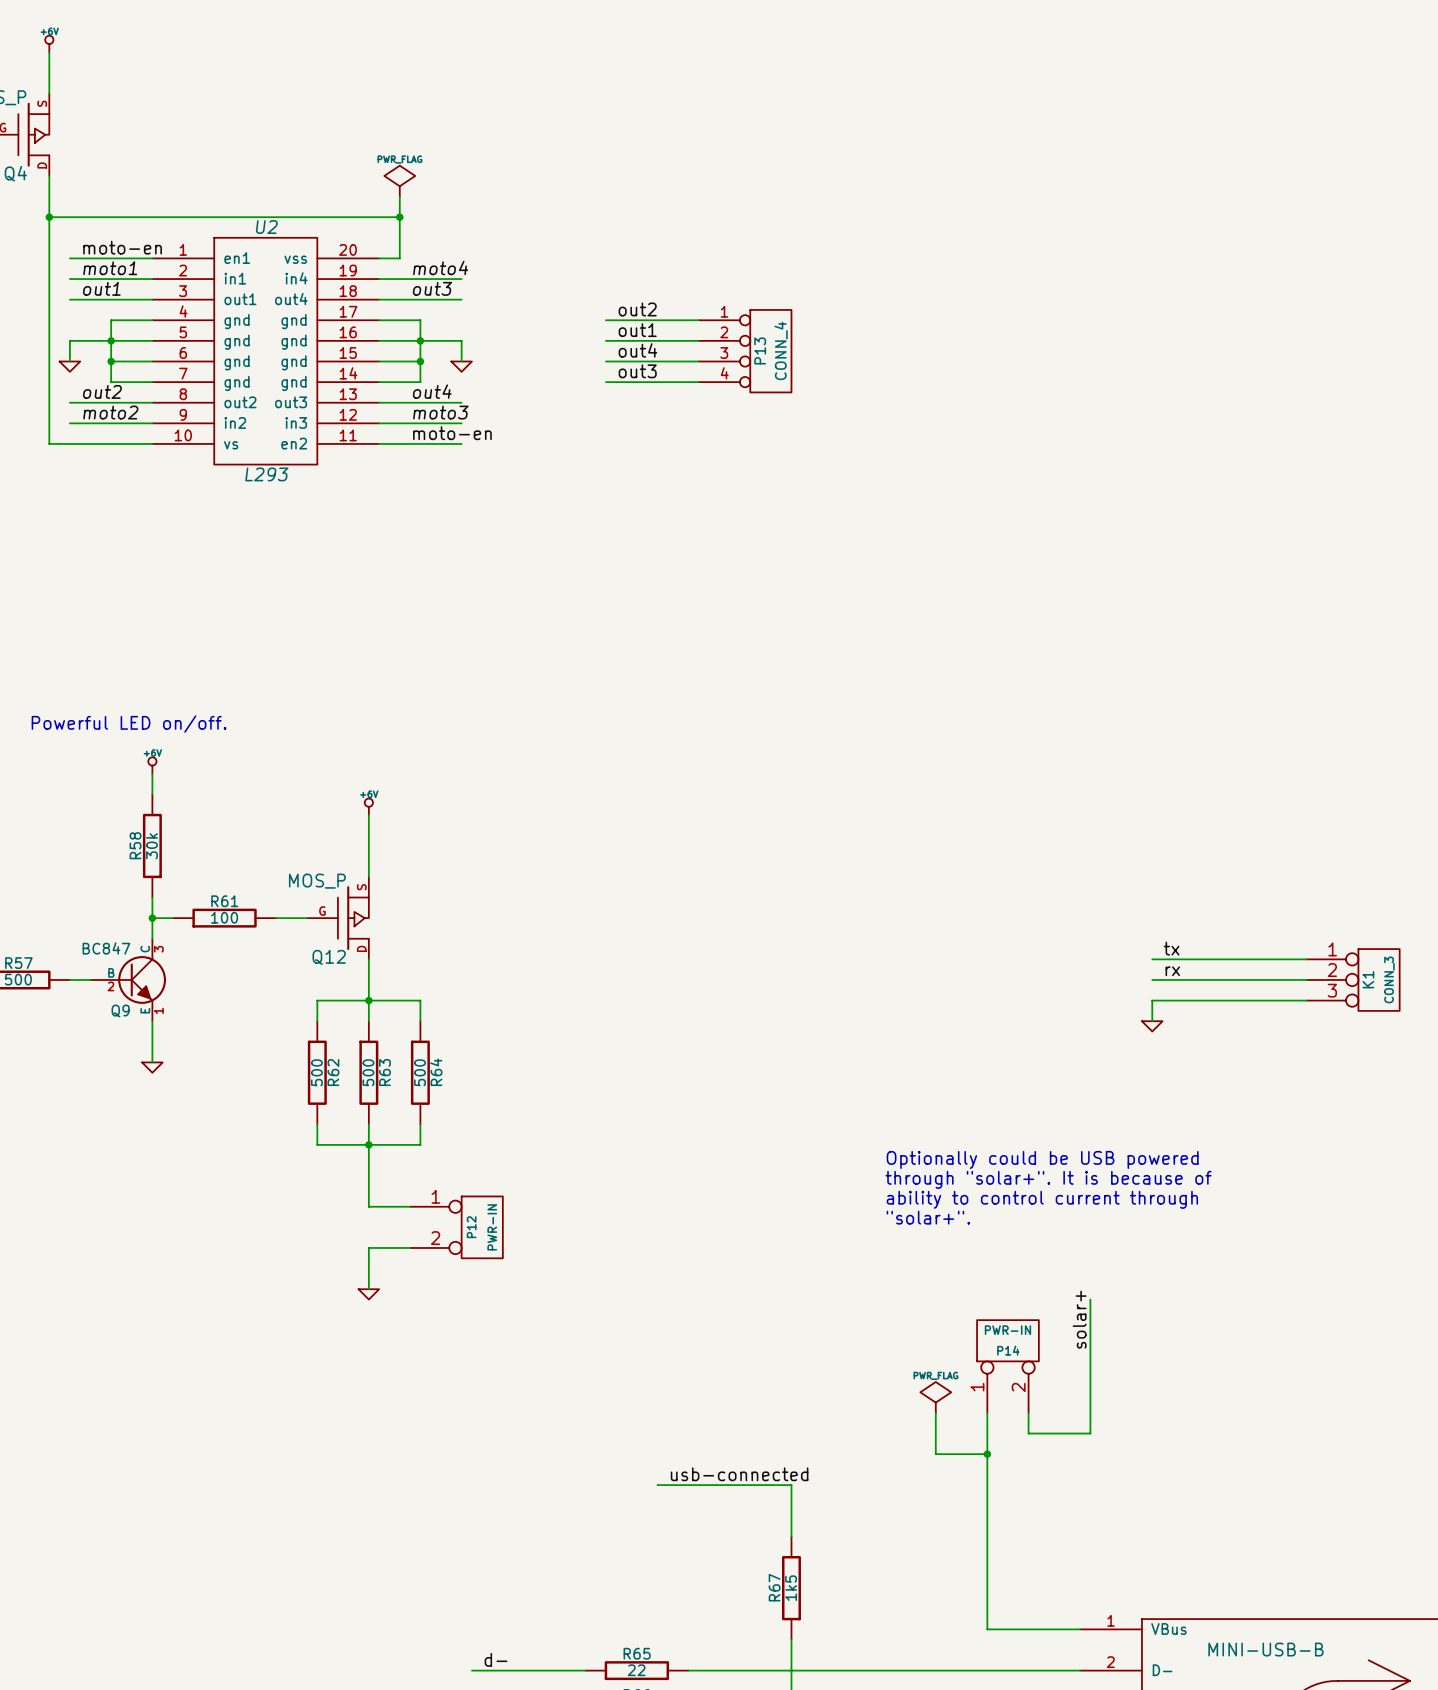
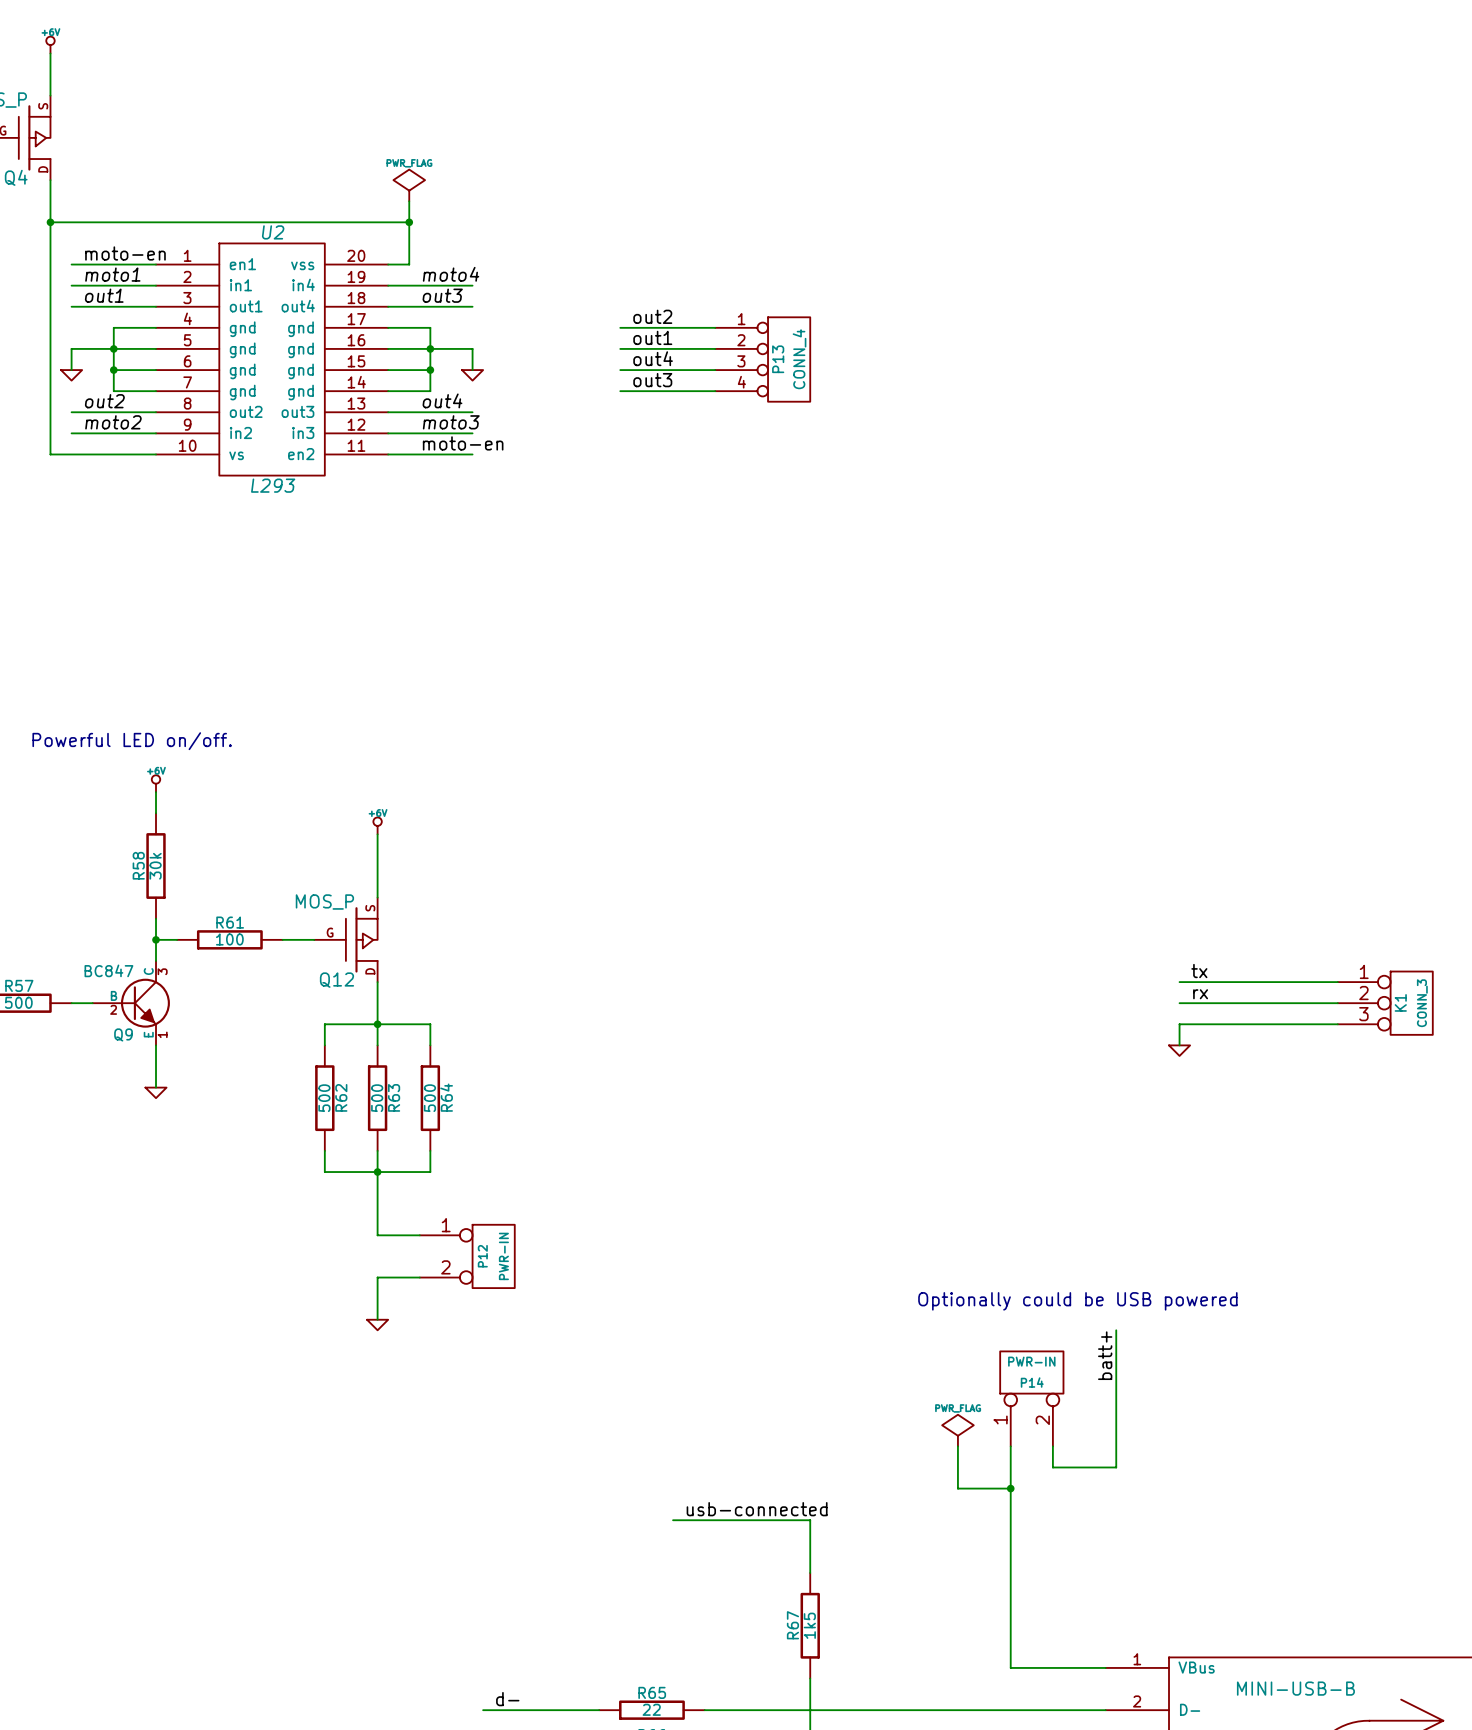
text position: Optionally could be USB powered (1042, 1159) -> Optionally could be USB powered (1077, 1301)
text: through "solar+". It is because of (1048, 1179) -> none
text: ability to control current through (1042, 1199) -> none
text: "solar+". (928, 1217) -> none
label: solar+ (1079, 1319) -> batt+ (1105, 1355)

